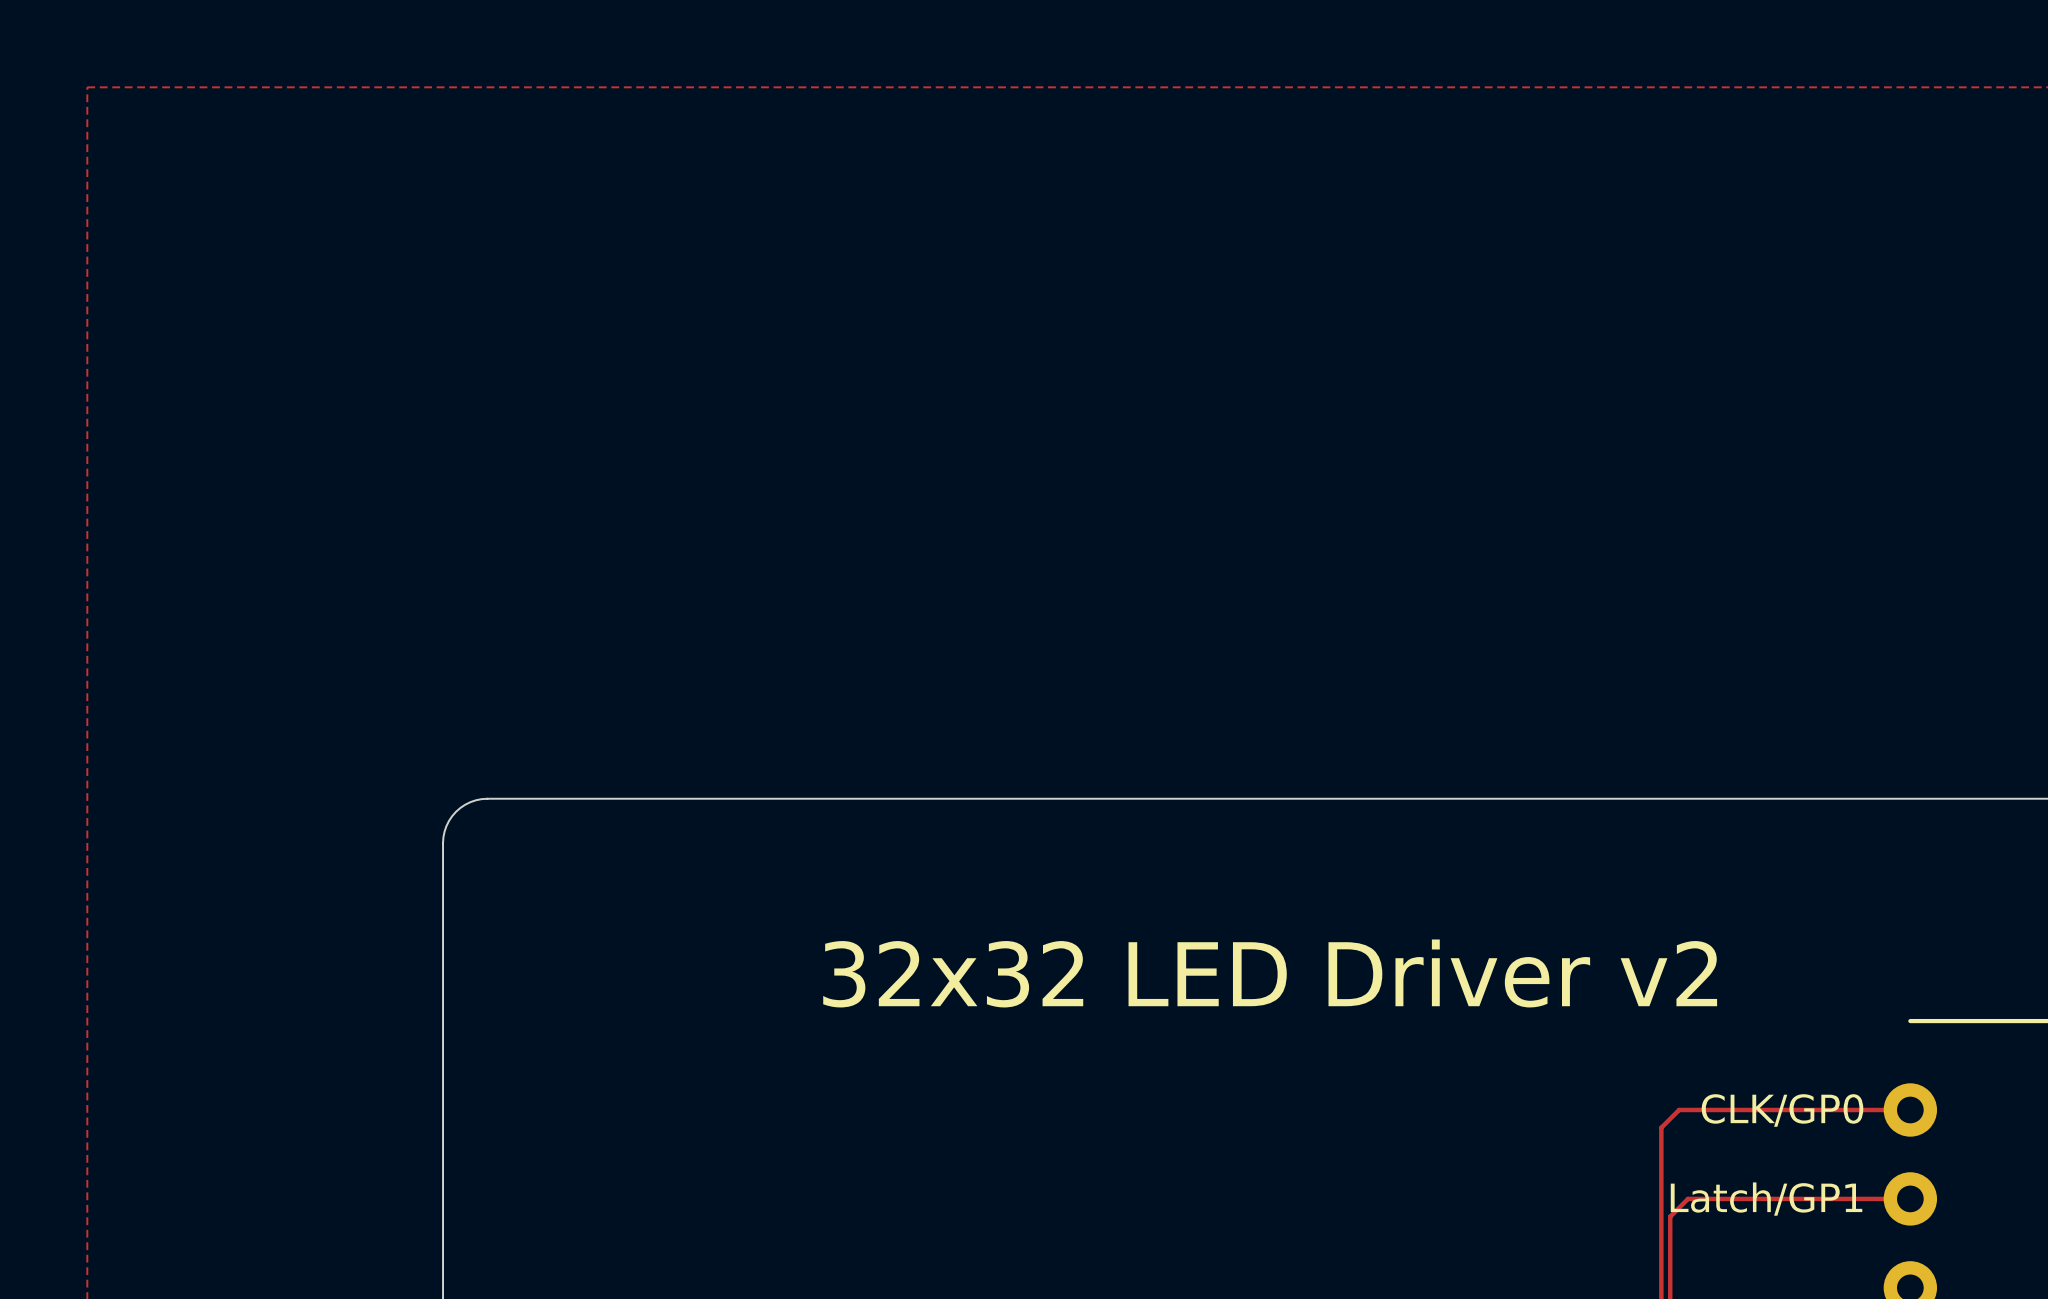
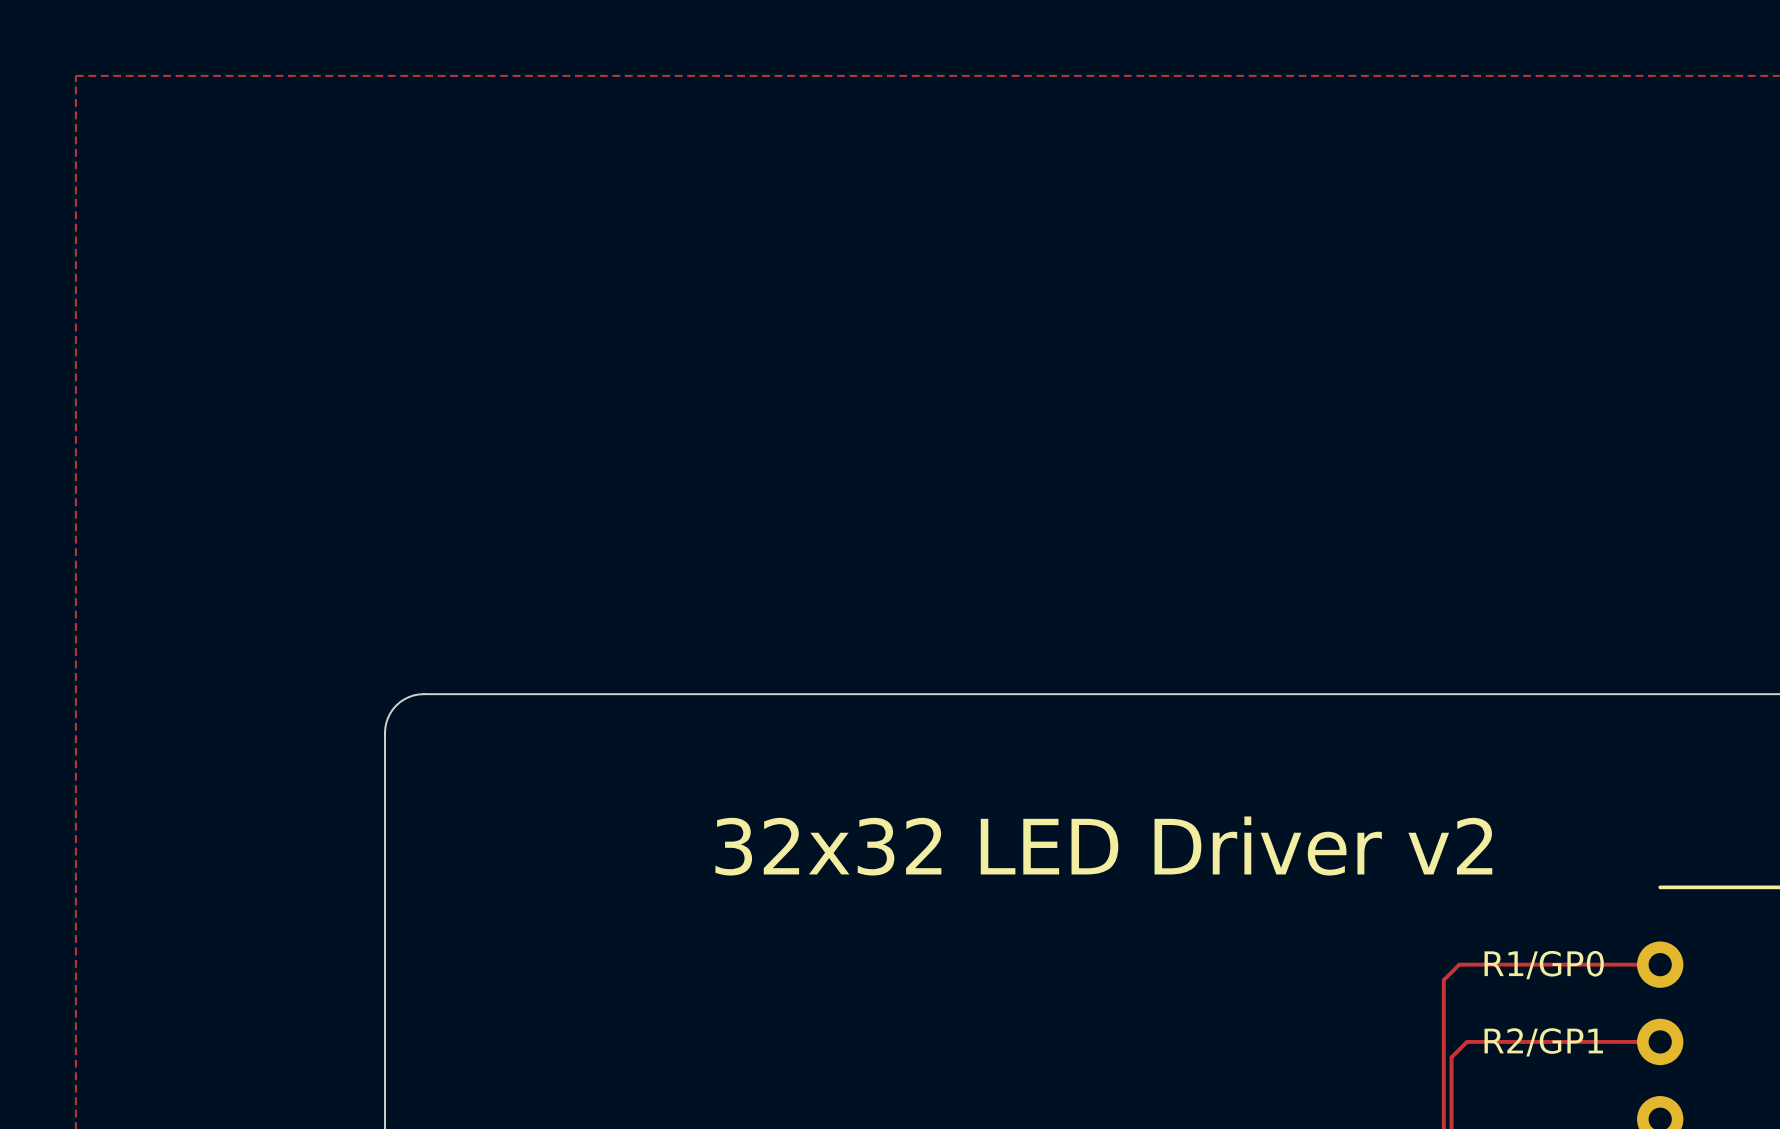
text: CLK/GP0 (1782, 1110) -> R1/GP0 (1544, 965)
text: Latch/GP1 (1766, 1199) -> R2/GP1 (1543, 1042)

